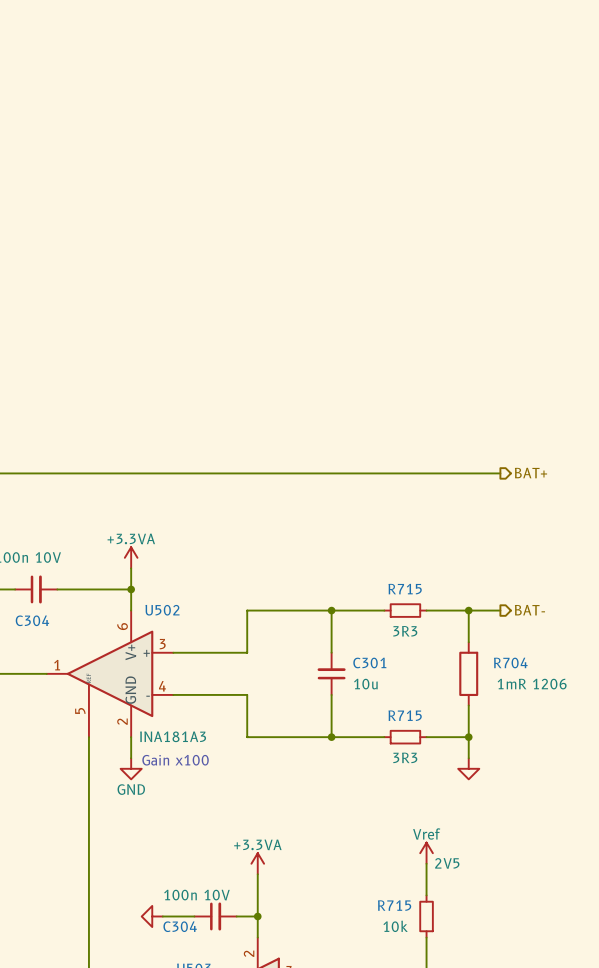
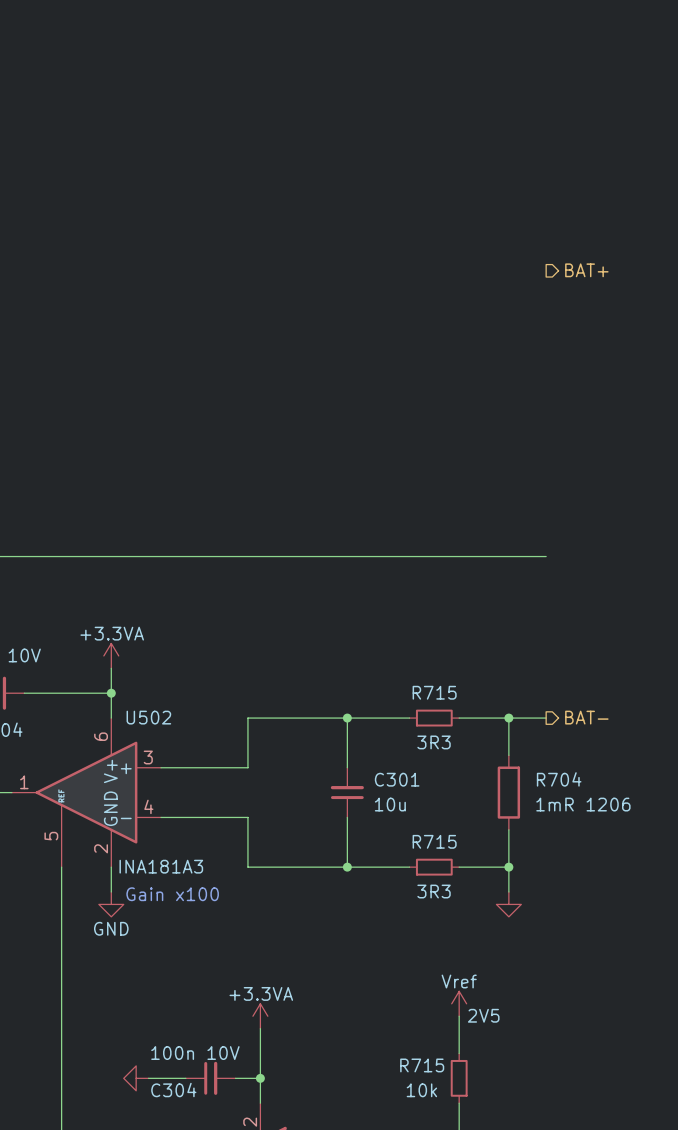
hierarchical label: none -> BAT+ (586, 270)
hierarchical label: BAT+ (531, 473) -> none

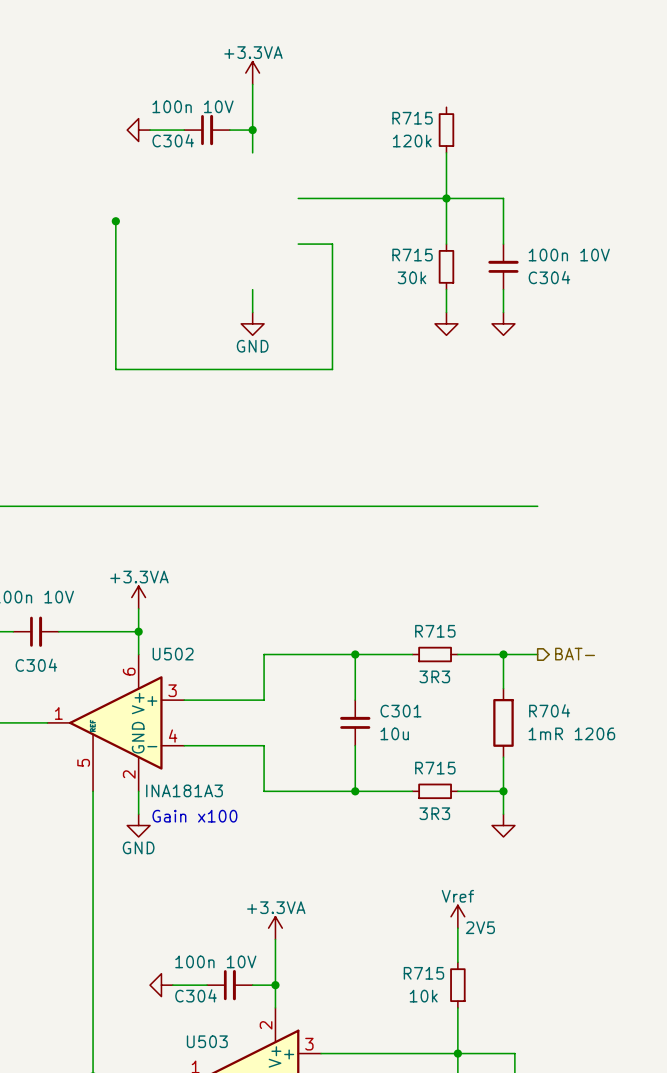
power symbol: none -> +3.3VA (252, 73)
wire: none -> (252, 84) (252, 152)
power symbol: none -> (138, 130)
wire: none -> (150, 130) (184, 130)
C304: none -> 100n 10V (207, 130)
wire: none -> (229, 130) (252, 130)
junction: none -> (252, 130)
R715: none -> 120k (446, 130)
wire: none -> (446, 152) (446, 244)
wire: none -> (298, 198) (503, 198) (503, 244)
junction: none -> (446, 198)
wire: none -> (115, 221) (115, 369) (332, 369) (332, 244) (298, 244)
junction: none -> (115, 221)
hierarchical label: BAT+ (586, 270) -> none
R715: none -> 30k (446, 266)
C304: none -> 100n 10V (503, 266)
wire: none -> (252, 289) (252, 312)
wire: none -> (446, 289) (446, 312)
wire: none -> (503, 289) (503, 312)
power symbol: none -> GND (252, 323)
power symbol: none -> (446, 323)
power symbol: none -> (503, 323)

